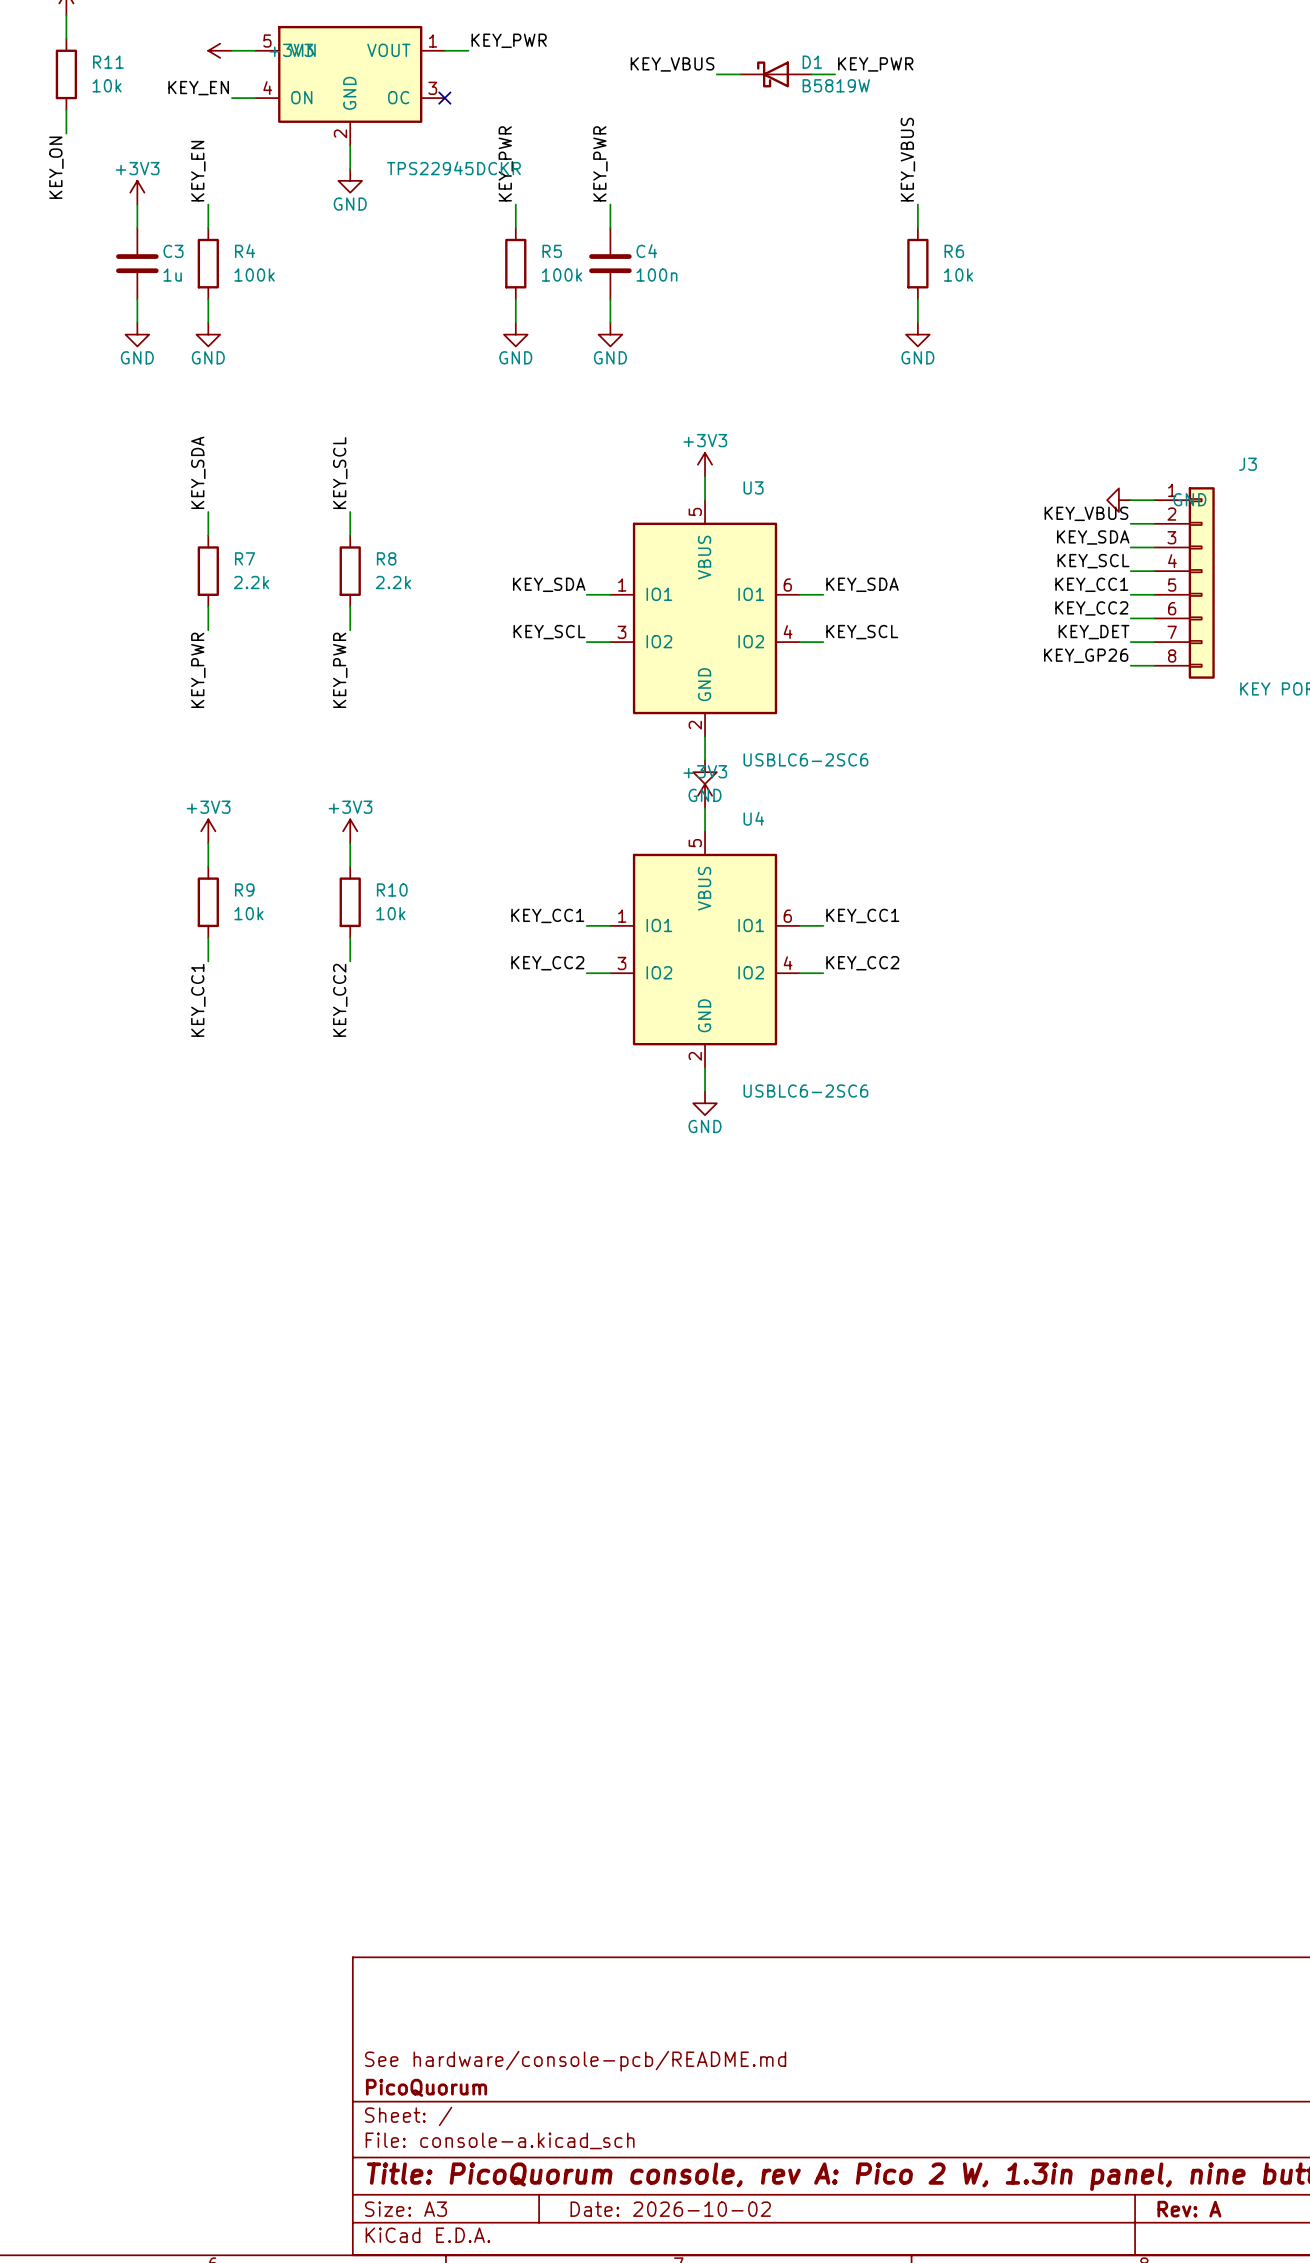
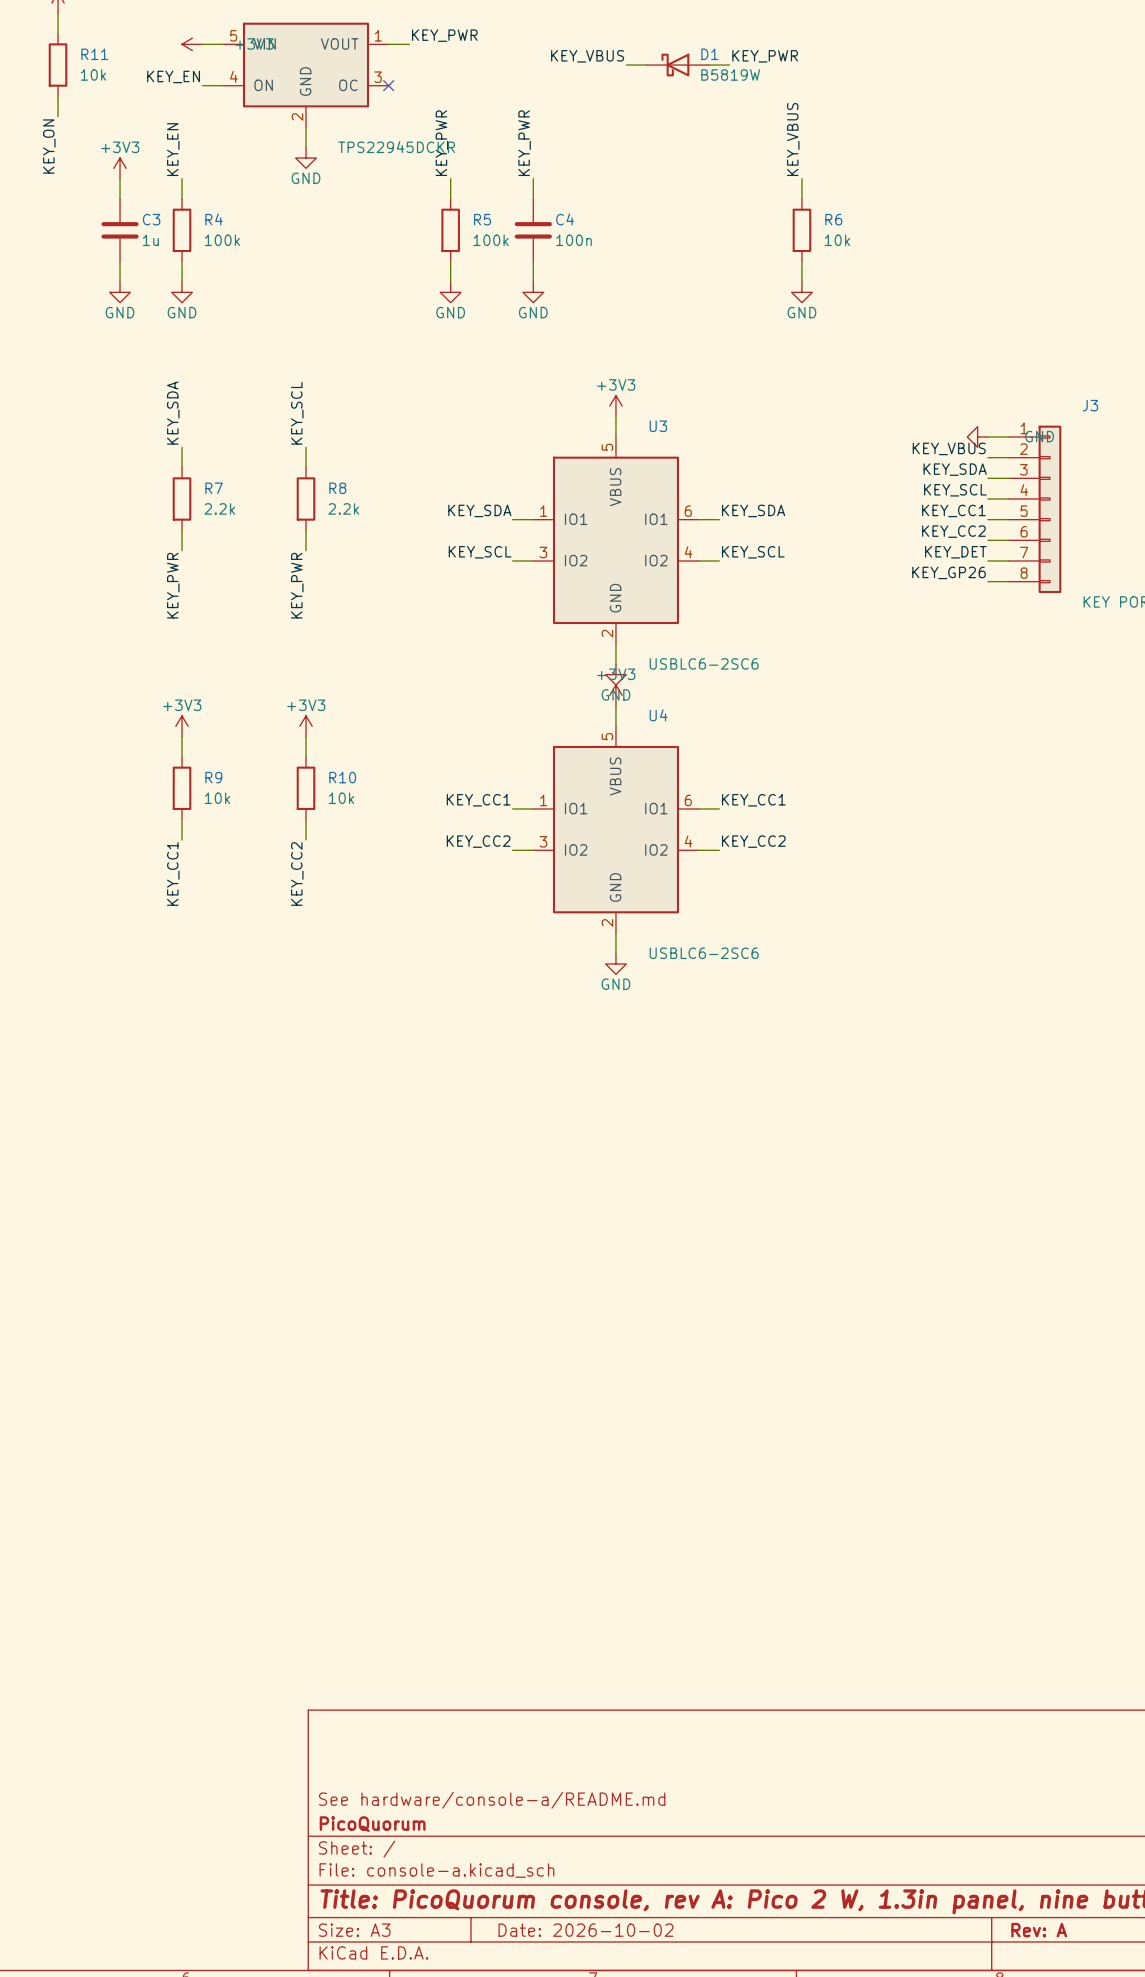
title block: See hardware/console-pcb/README.md (575, 2061) -> See hardware/console-a/README.md (492, 1800)

